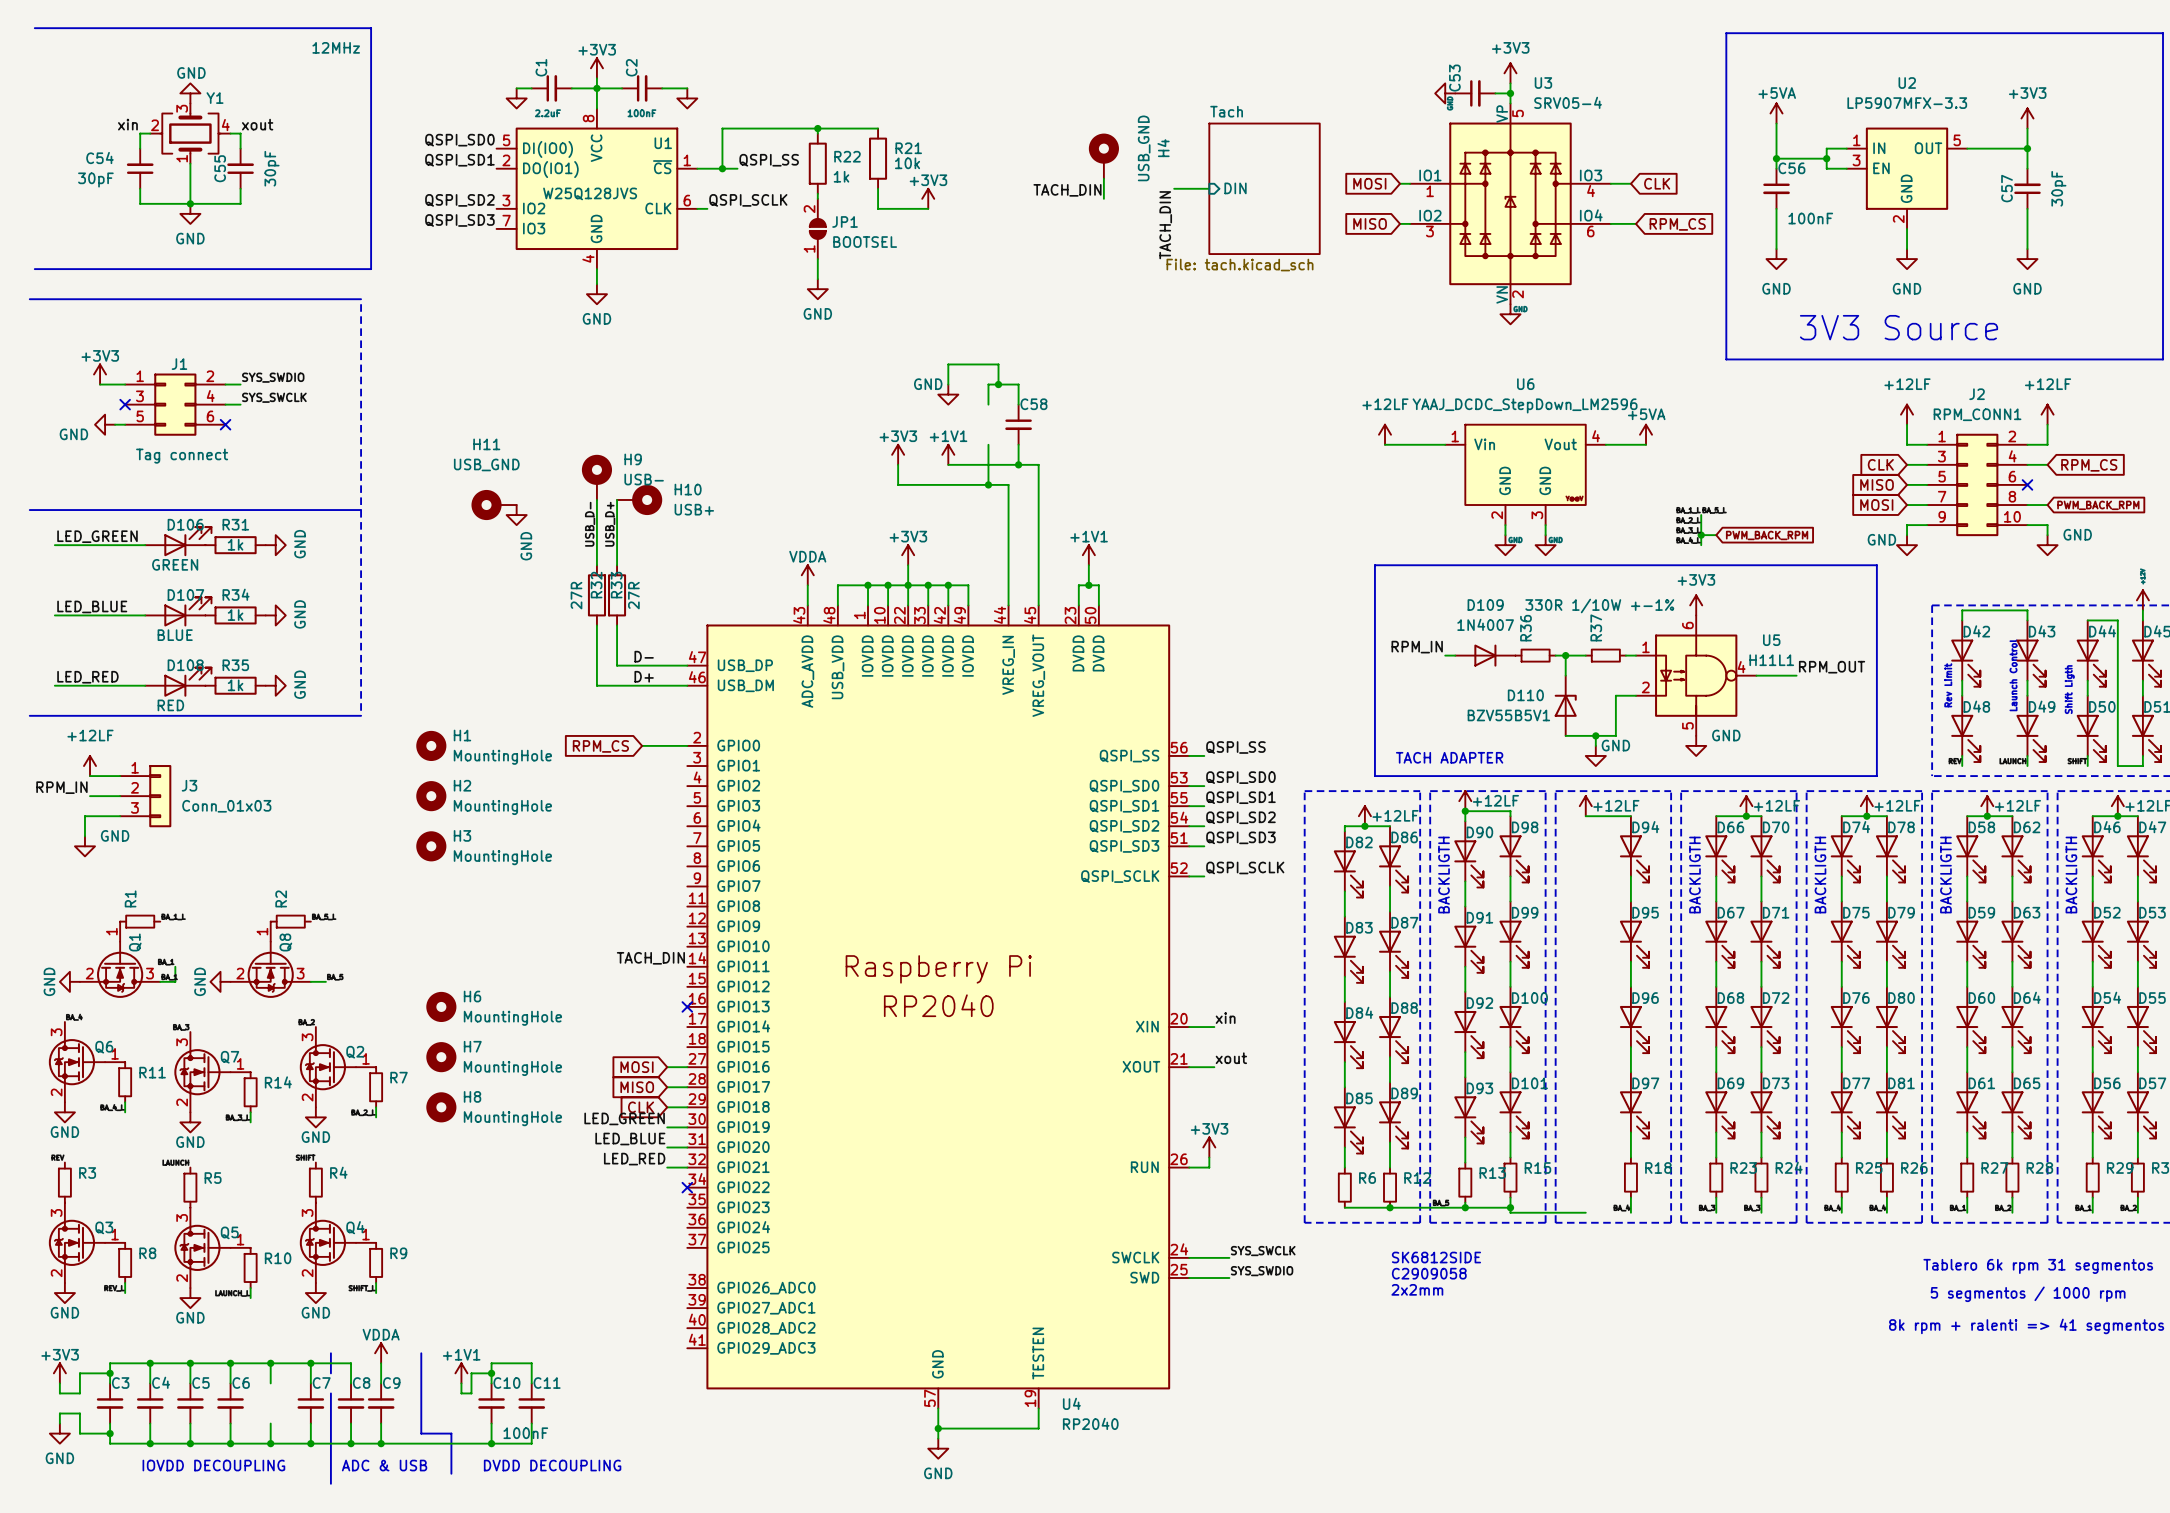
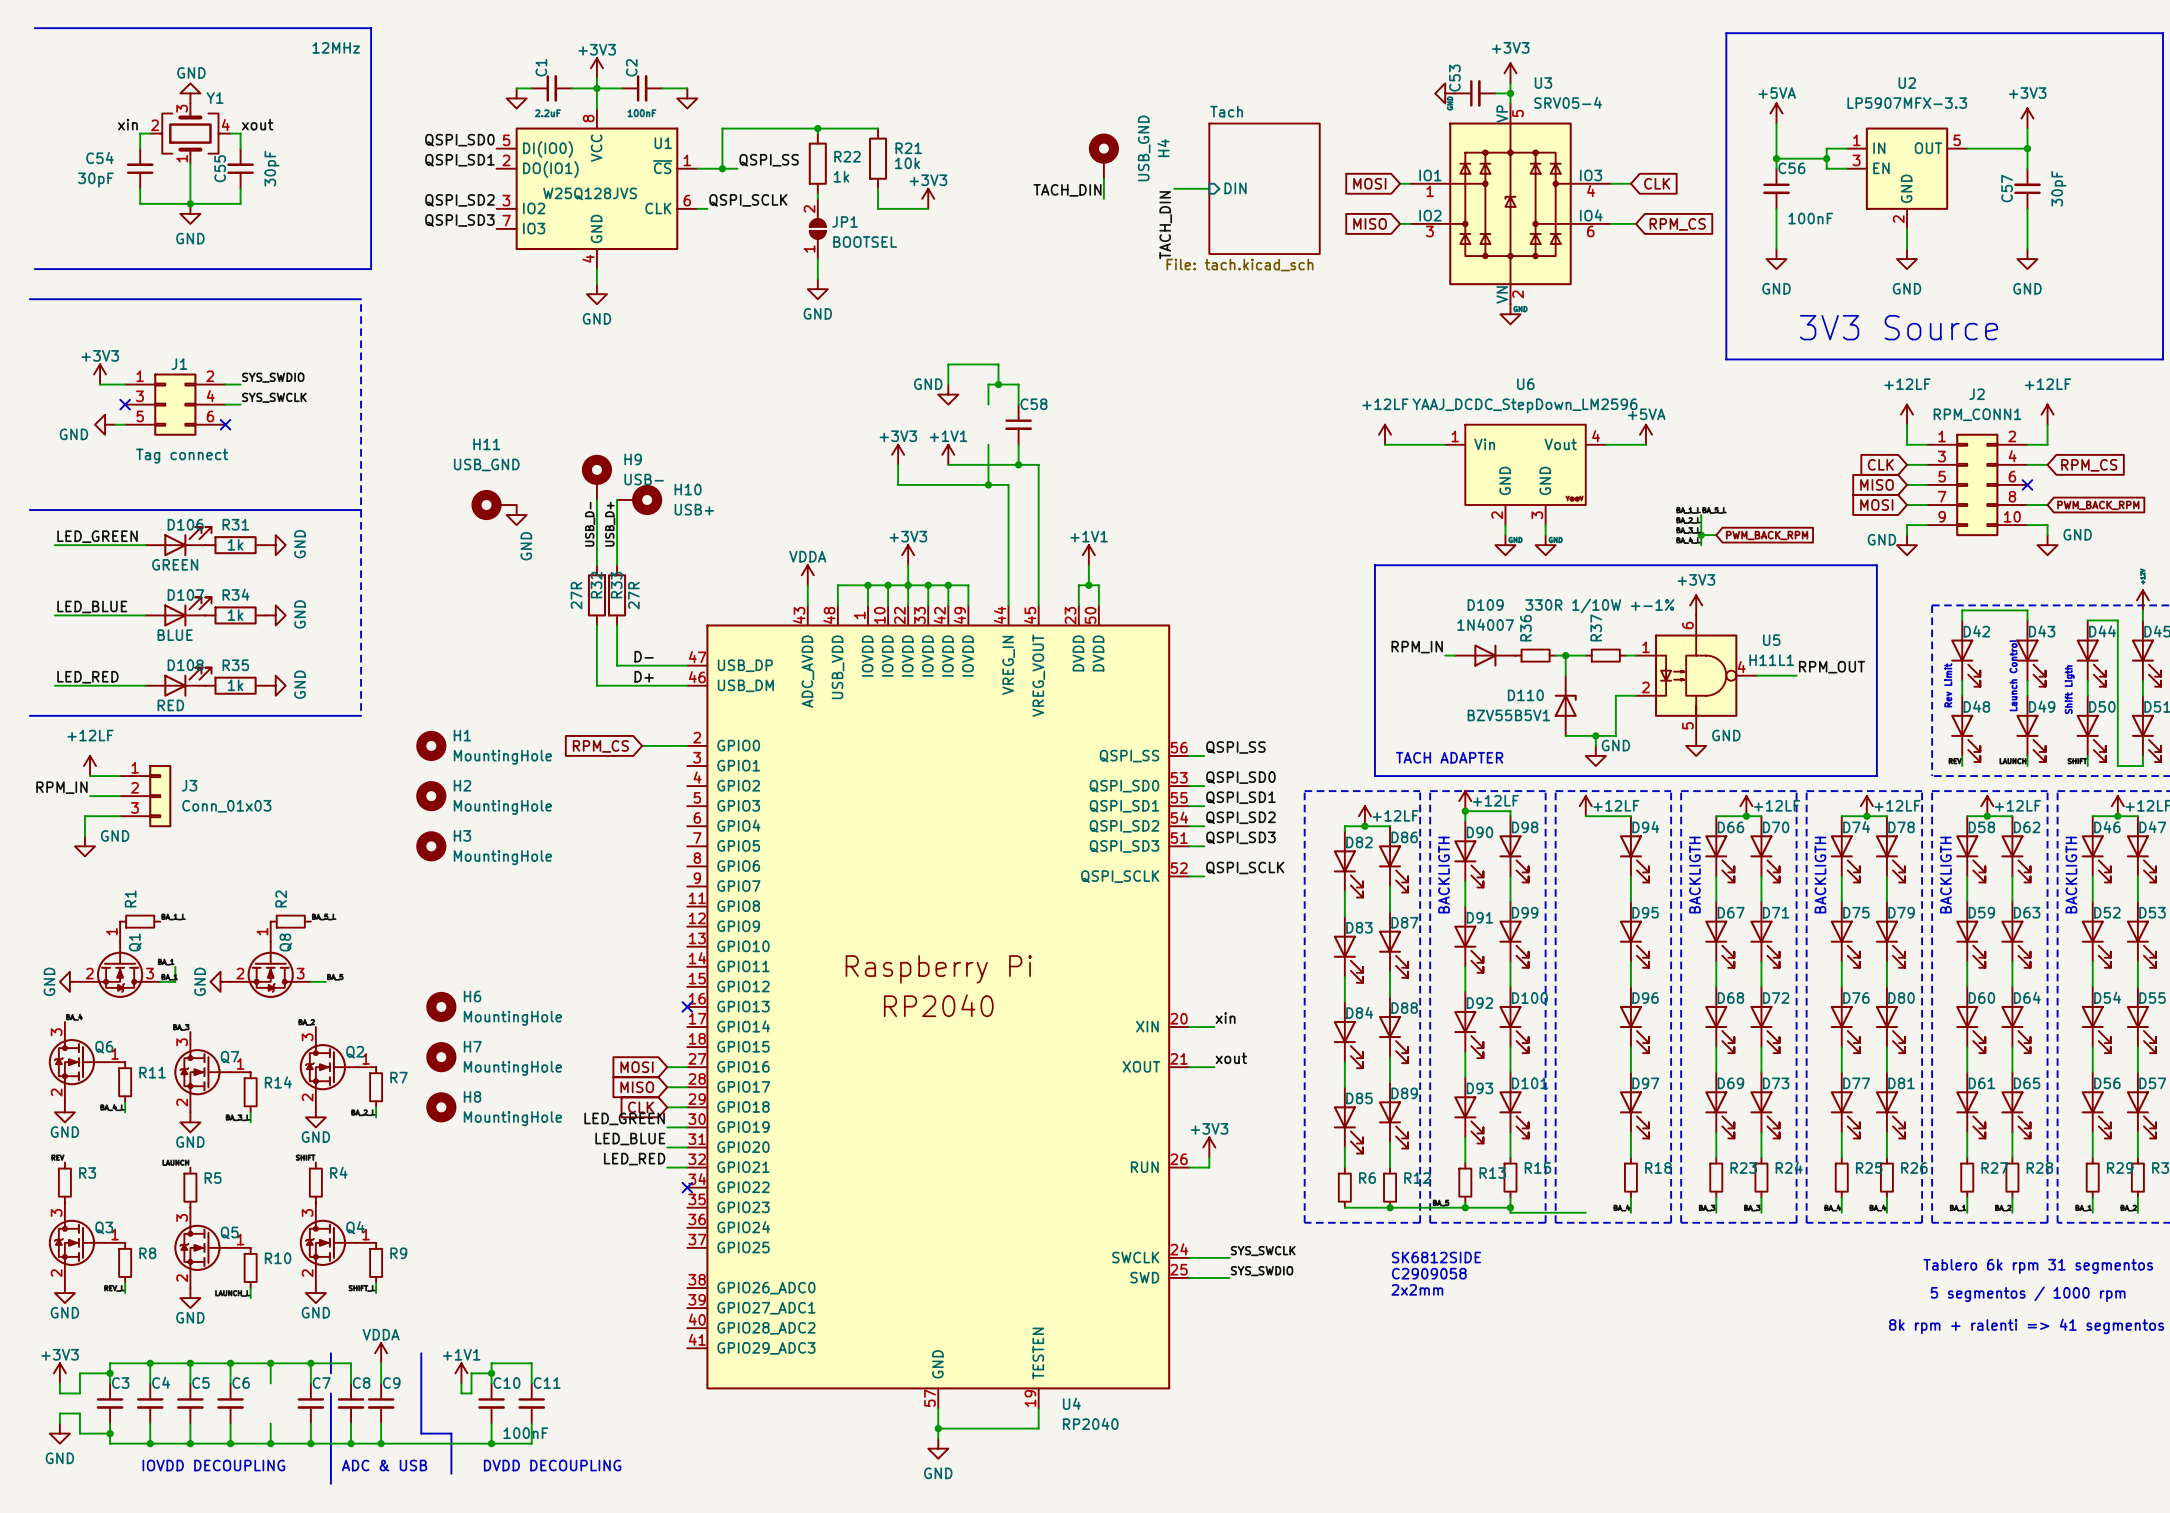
label: TACH_DIN (650, 958) -> none

